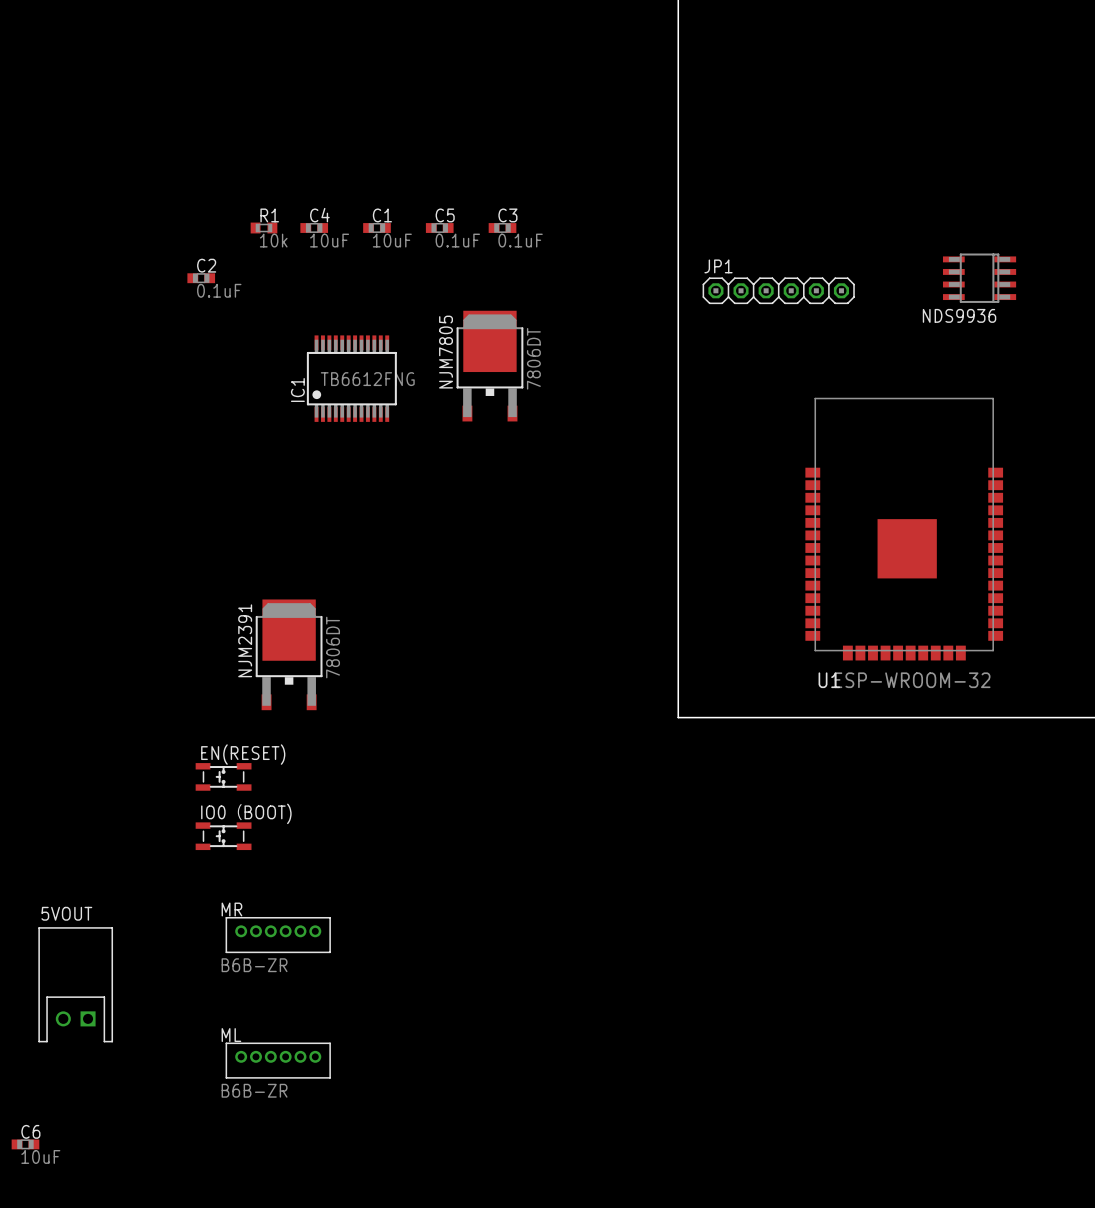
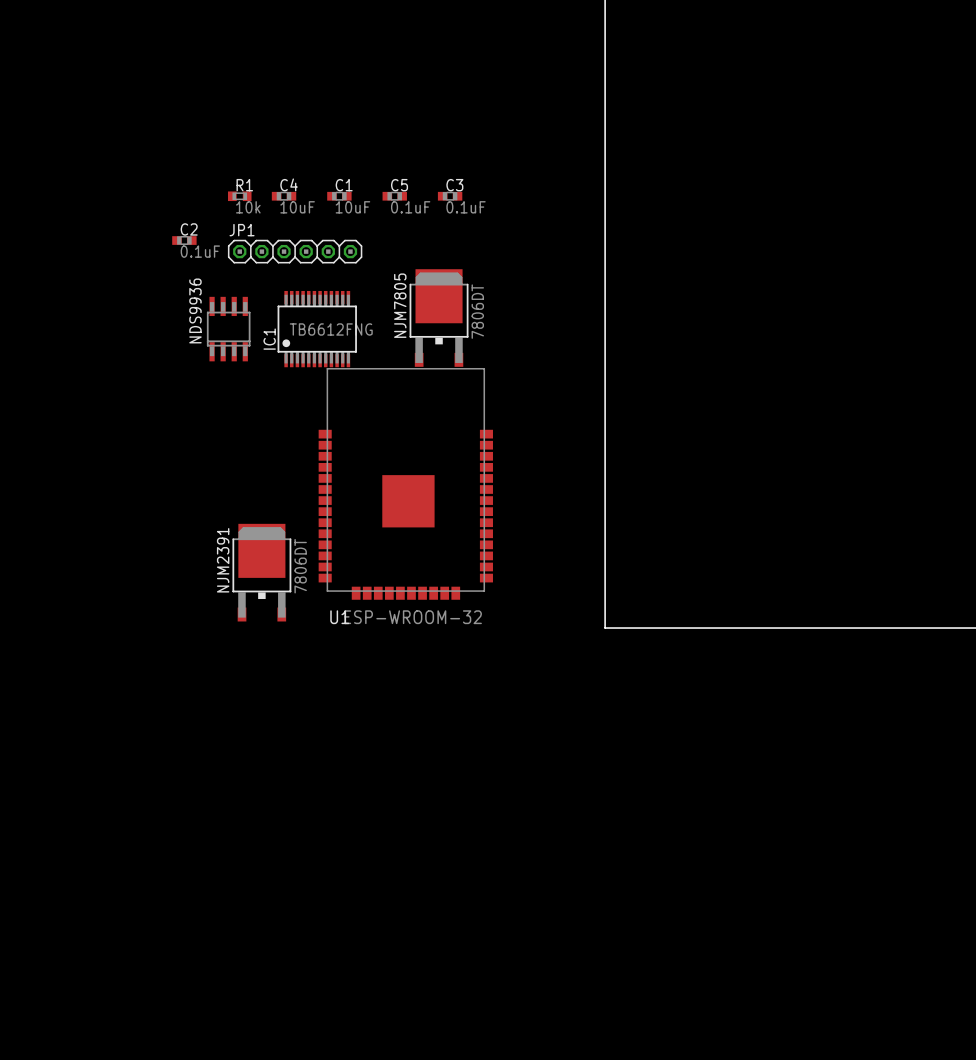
NDS9936 rotation: 0° (979, 278) -> 90° clockwise (228, 329)
NDS9936 position: (979, 278) -> (228, 329)
JP1 position: (778, 290) -> (295, 251)
U1 position: (904, 529) -> (405, 483)
EN(RESET): (223, 776) -> none
IO0（BOOT): (223, 836) -> none
MR: B6B-ZR (278, 935) -> none
5VOUT: (75, 984) -> none
ML: B6B-ZR (278, 1060) -> none
C6: 10uF (25, 1144) -> none

